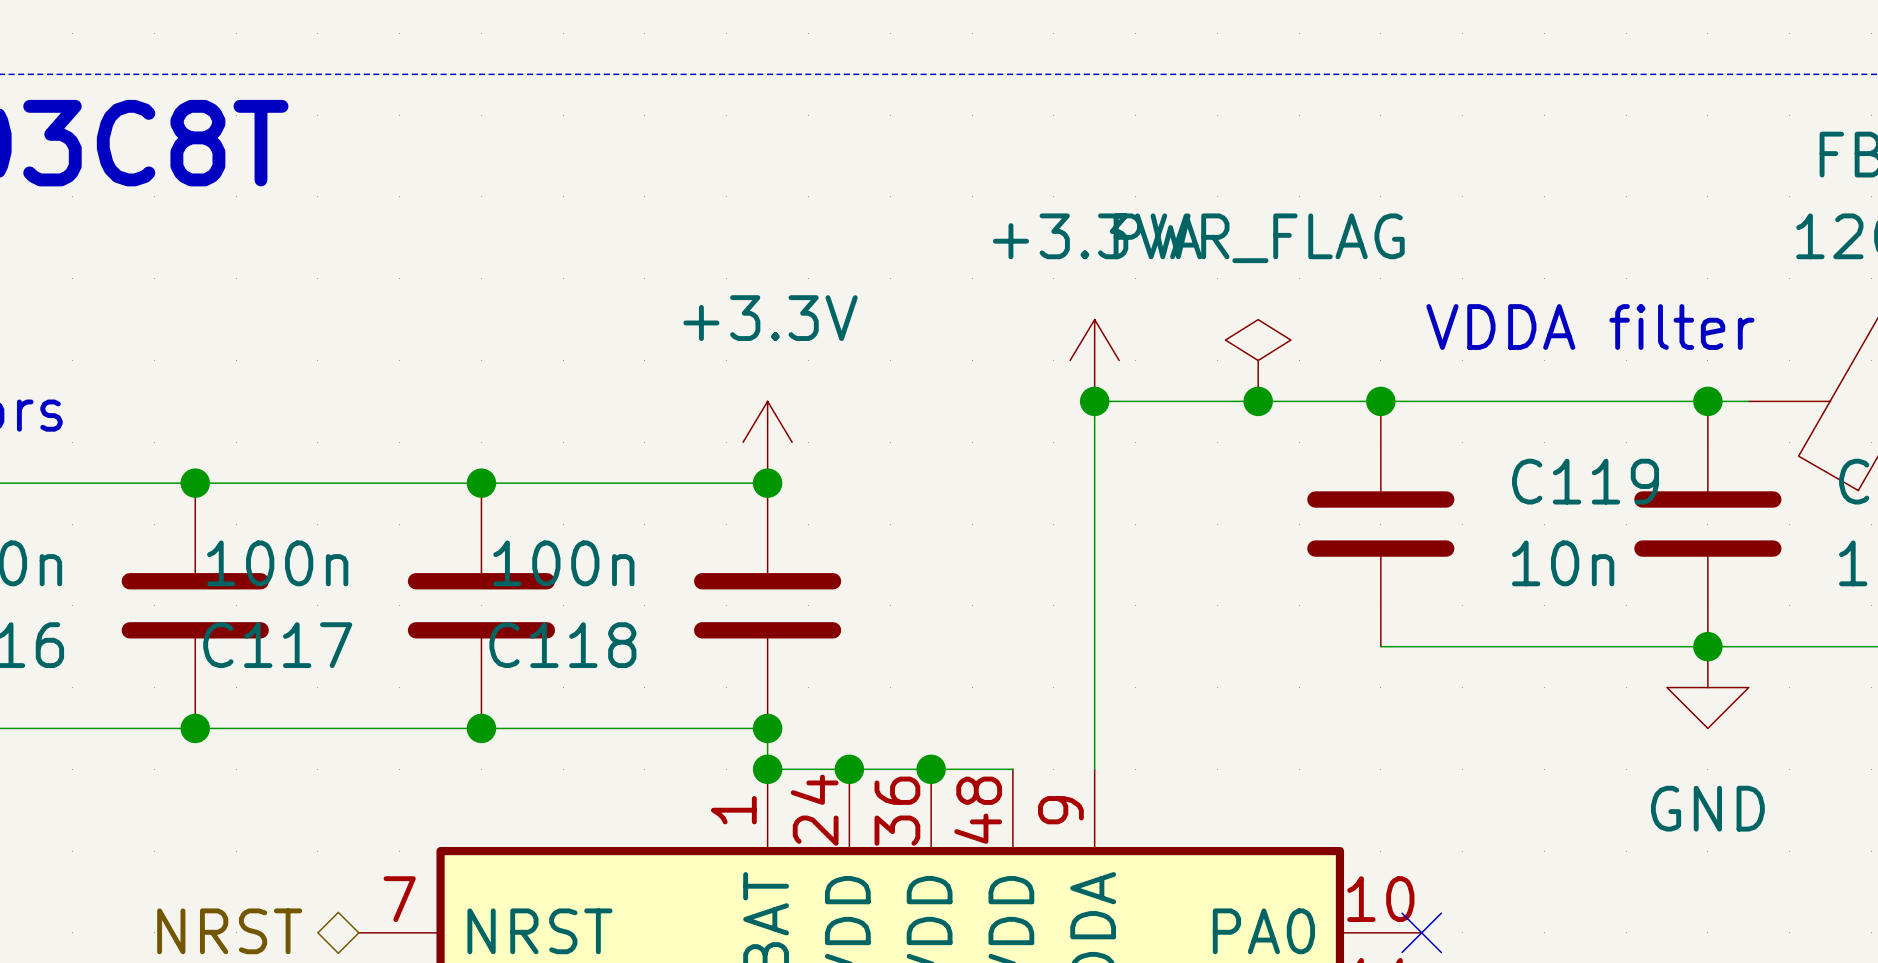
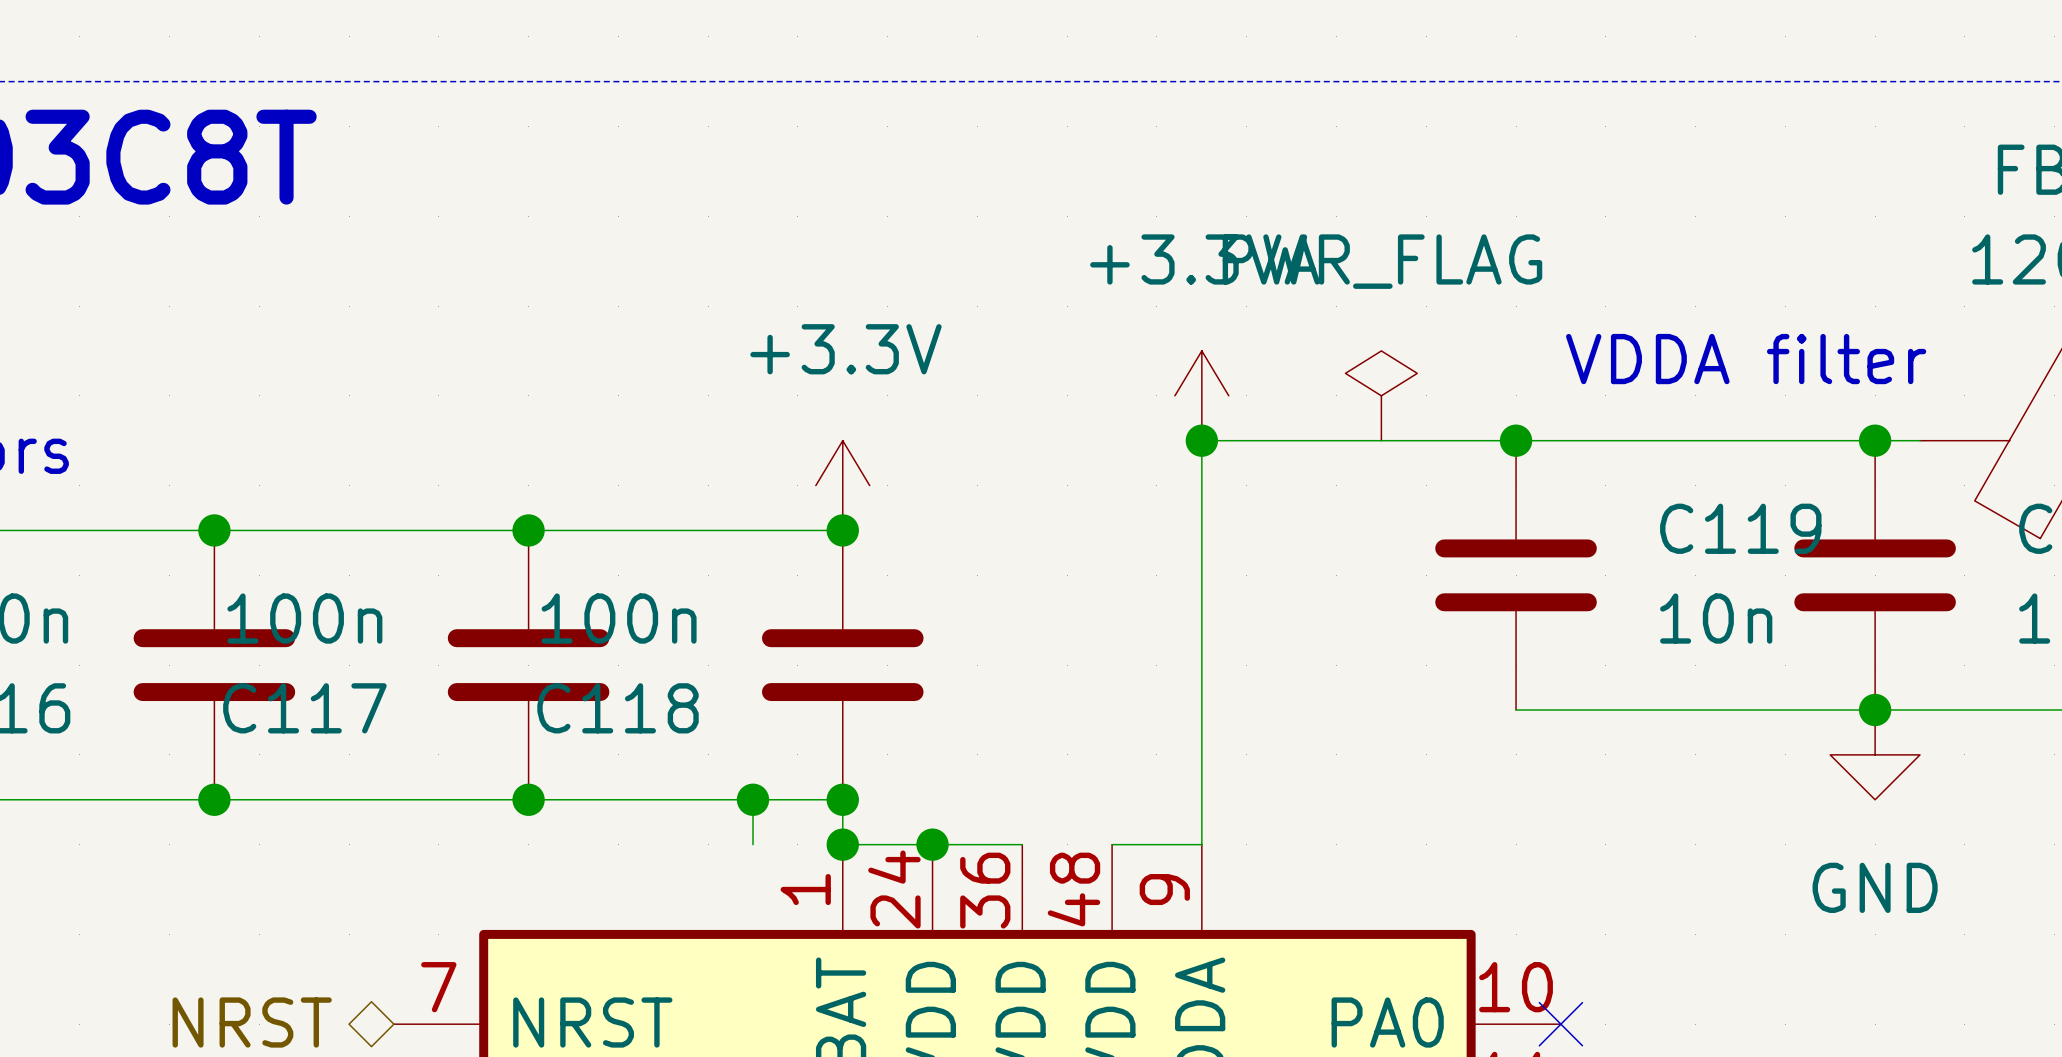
junction: (1258, 401) -> none
wire: none -> (753, 799) (753, 844)
junction: none -> (753, 799)
wire: (931, 769) (1012, 769) -> (1201, 844) (1112, 844)
junction: (931, 769) -> none

